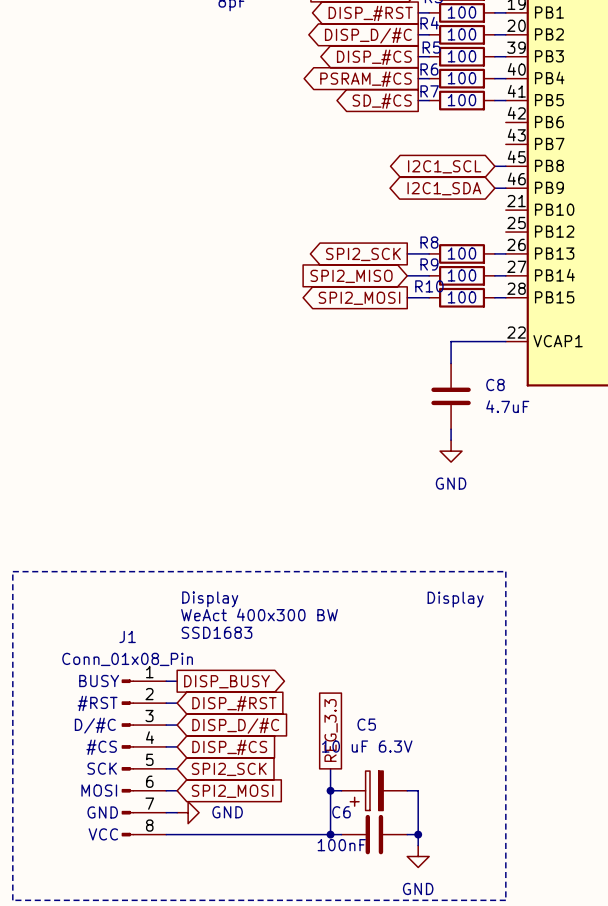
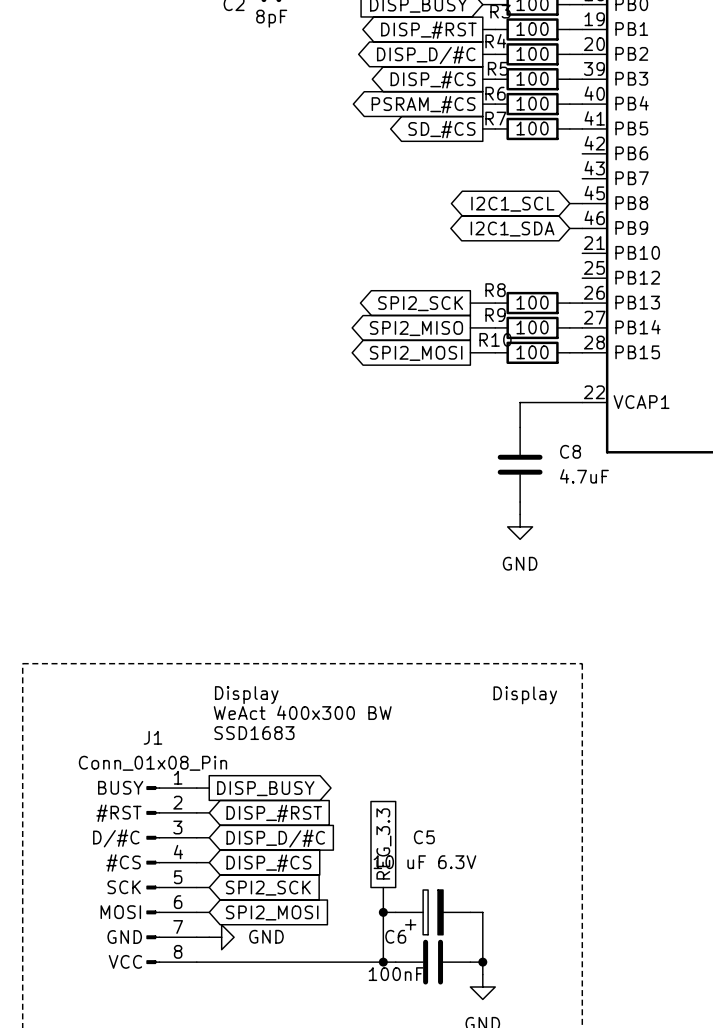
global label shape: input (351, 276) -> output (416, 328)

